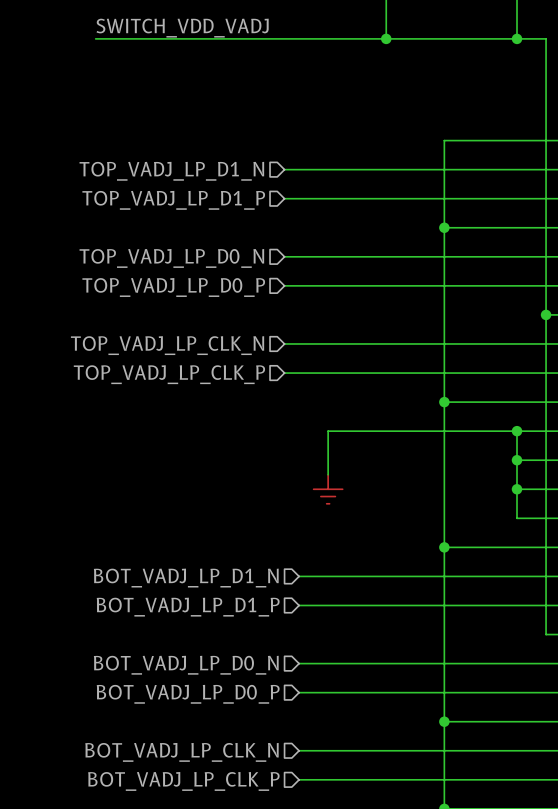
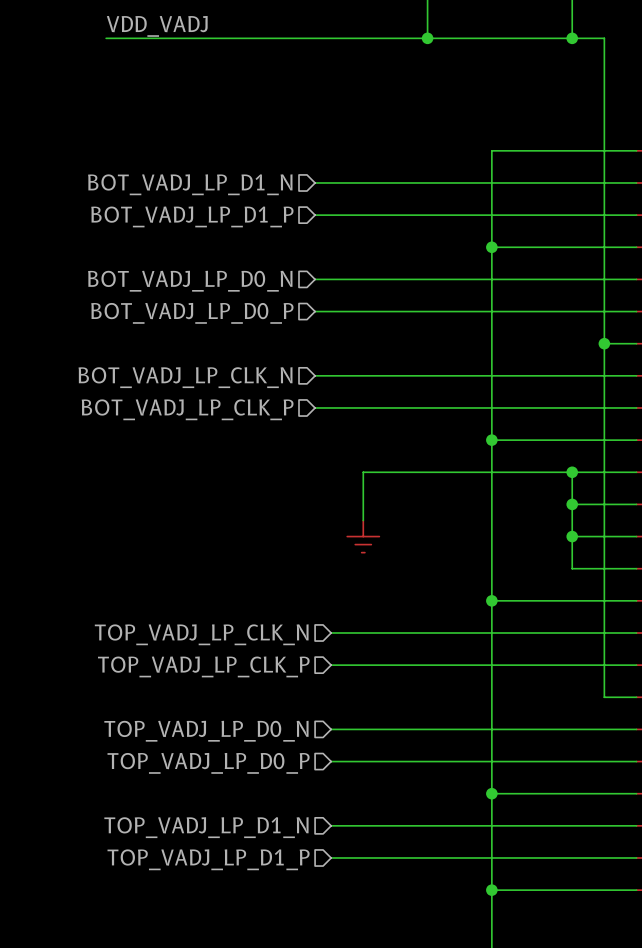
label: SWITCH_VDD_VADJ (182, 28) -> VDD_VADJ (157, 26)
hierarchical label: TOP_VADJ_LP_D1_N (171, 171) -> BOT_VADJ_LP_D1_N (190, 184)
hierarchical label: TOP_VADJ_LP_D1_P (173, 200) -> BOT_VADJ_LP_D1_P (192, 216)
hierarchical label: TOP_VADJ_LP_D0_N (171, 258) -> BOT_VADJ_LP_D0_N (190, 281)
hierarchical label: TOP_VADJ_LP_D0_P (173, 287) -> BOT_VADJ_LP_D0_P (192, 313)
hierarchical label: TOP_VADJ_LP_CLK_N (167, 345) -> BOT_VADJ_LP_CLK_N (185, 377)
hierarchical label: TOP_VADJ_LP_CLK_P (169, 374) -> BOT_VADJ_LP_CLK_P (187, 409)
hierarchical label: BOT_VADJ_LP_D1_N (186, 578) -> TOP_VADJ_LP_CLK_N (201, 634)
hierarchical label: BOT_VADJ_LP_D1_P (188, 607) -> TOP_VADJ_LP_CLK_P (203, 666)
hierarchical label: BOT_VADJ_LP_D0_N (186, 665) -> TOP_VADJ_LP_D0_N (206, 731)
hierarchical label: BOT_VADJ_LP_D0_P (188, 694) -> TOP_VADJ_LP_D0_P (208, 763)
hierarchical label: BOT_VADJ_LP_CLK_N (181, 752) -> TOP_VADJ_LP_D1_N (206, 827)
hierarchical label: BOT_VADJ_LP_CLK_P (183, 781) -> TOP_VADJ_LP_D1_P (208, 859)

